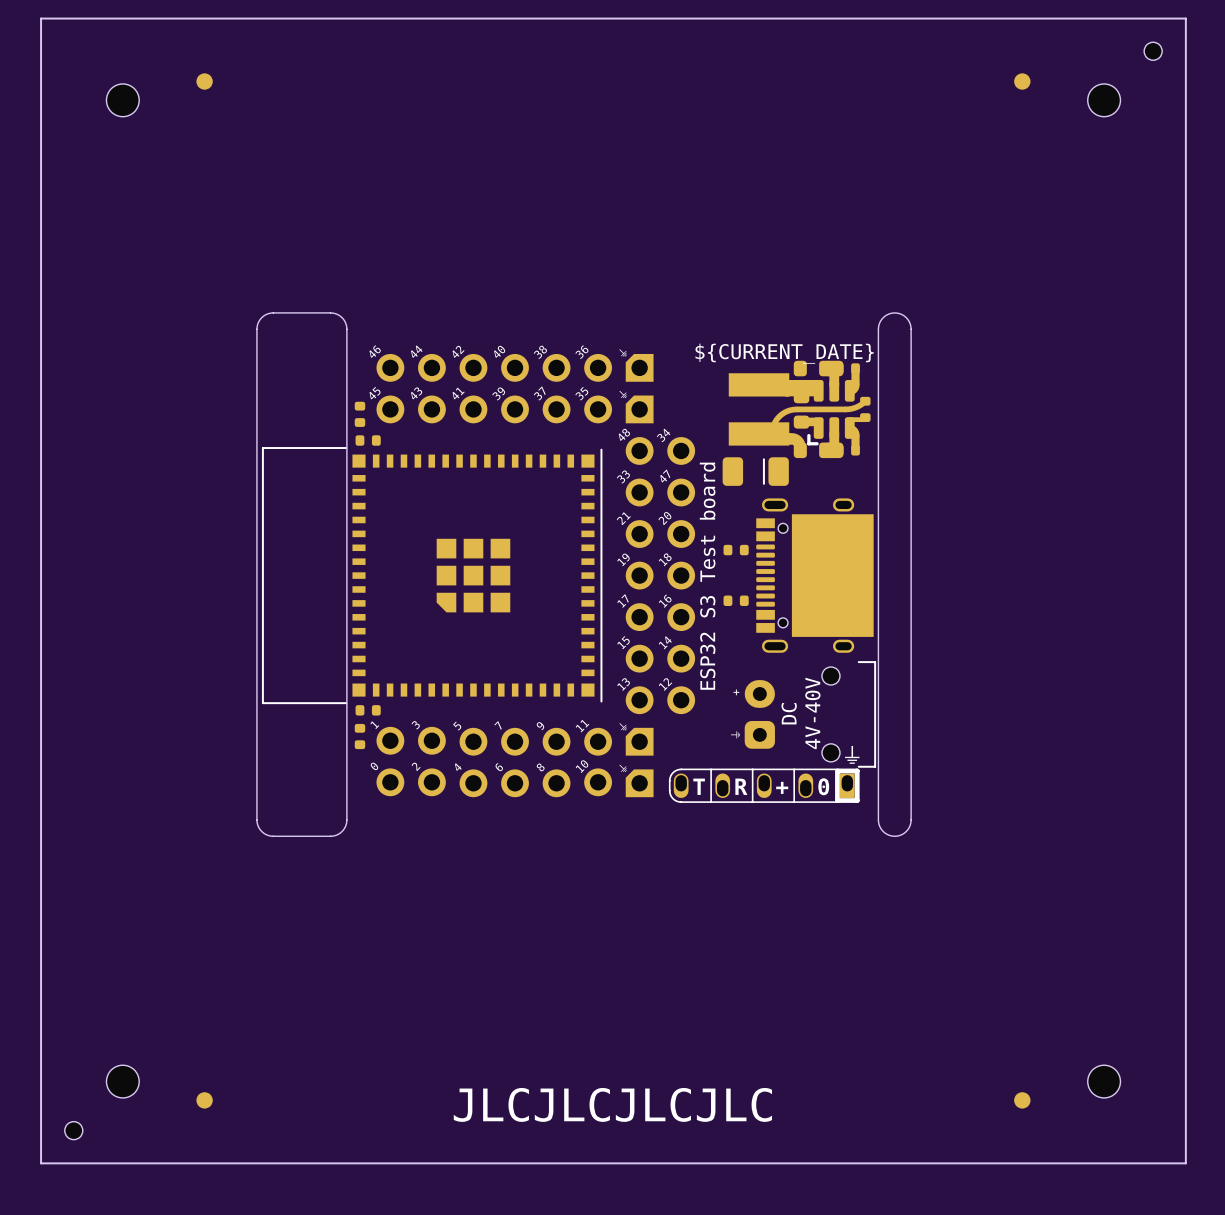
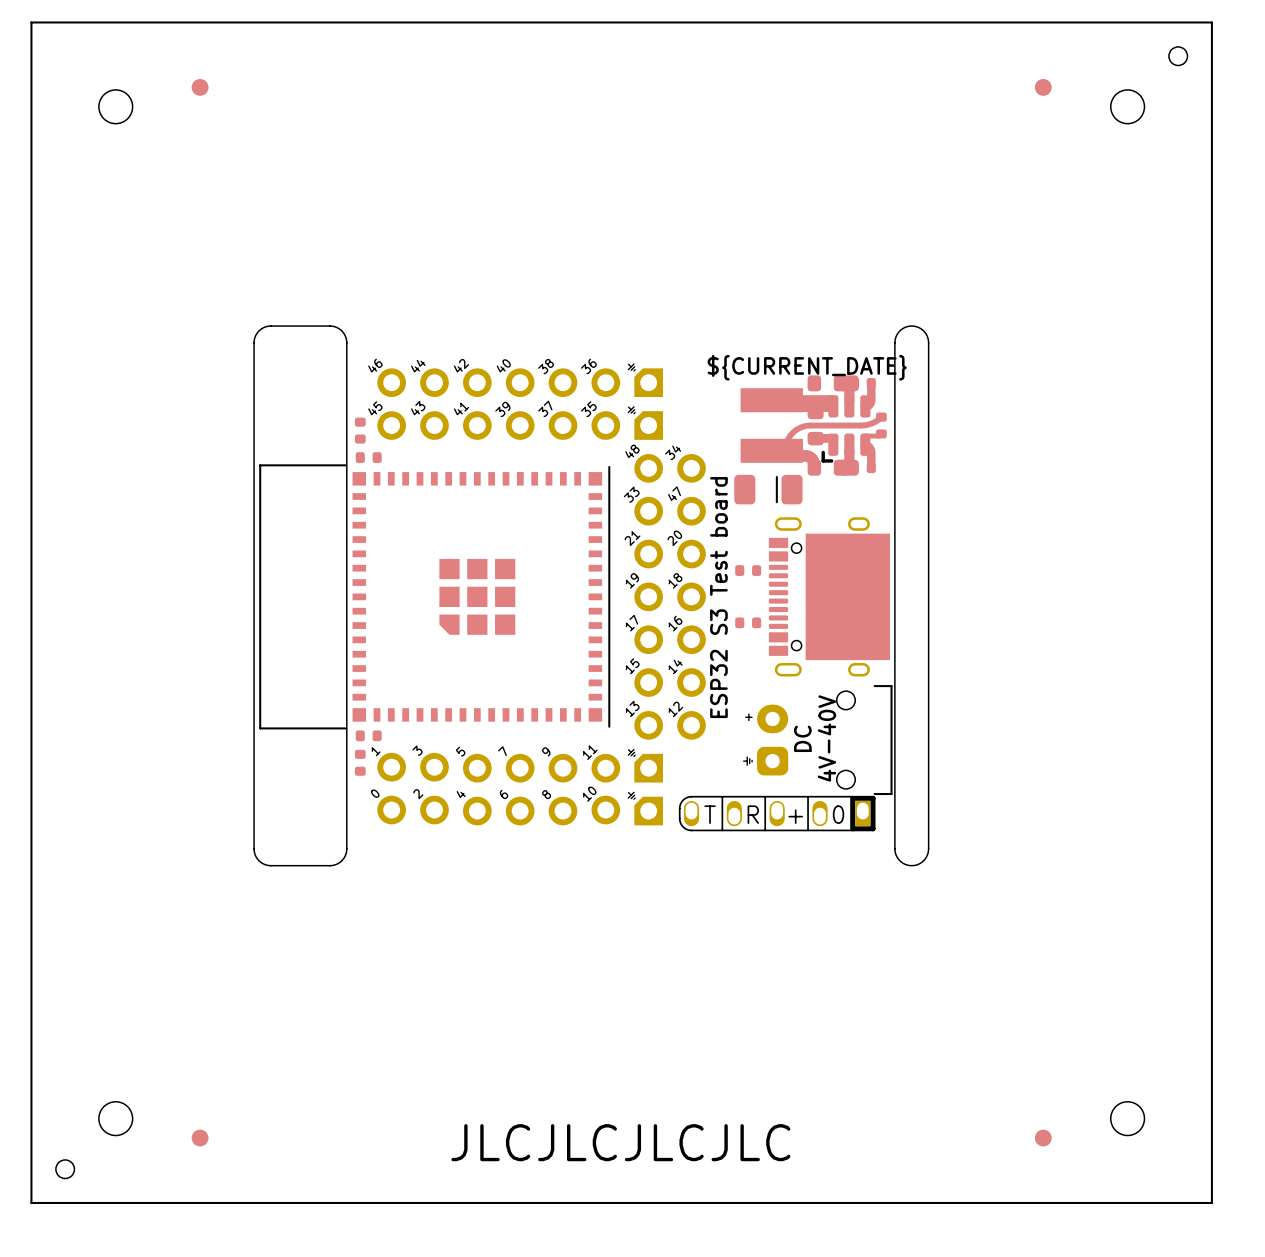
part text: ⏚ (852, 754) -> none

